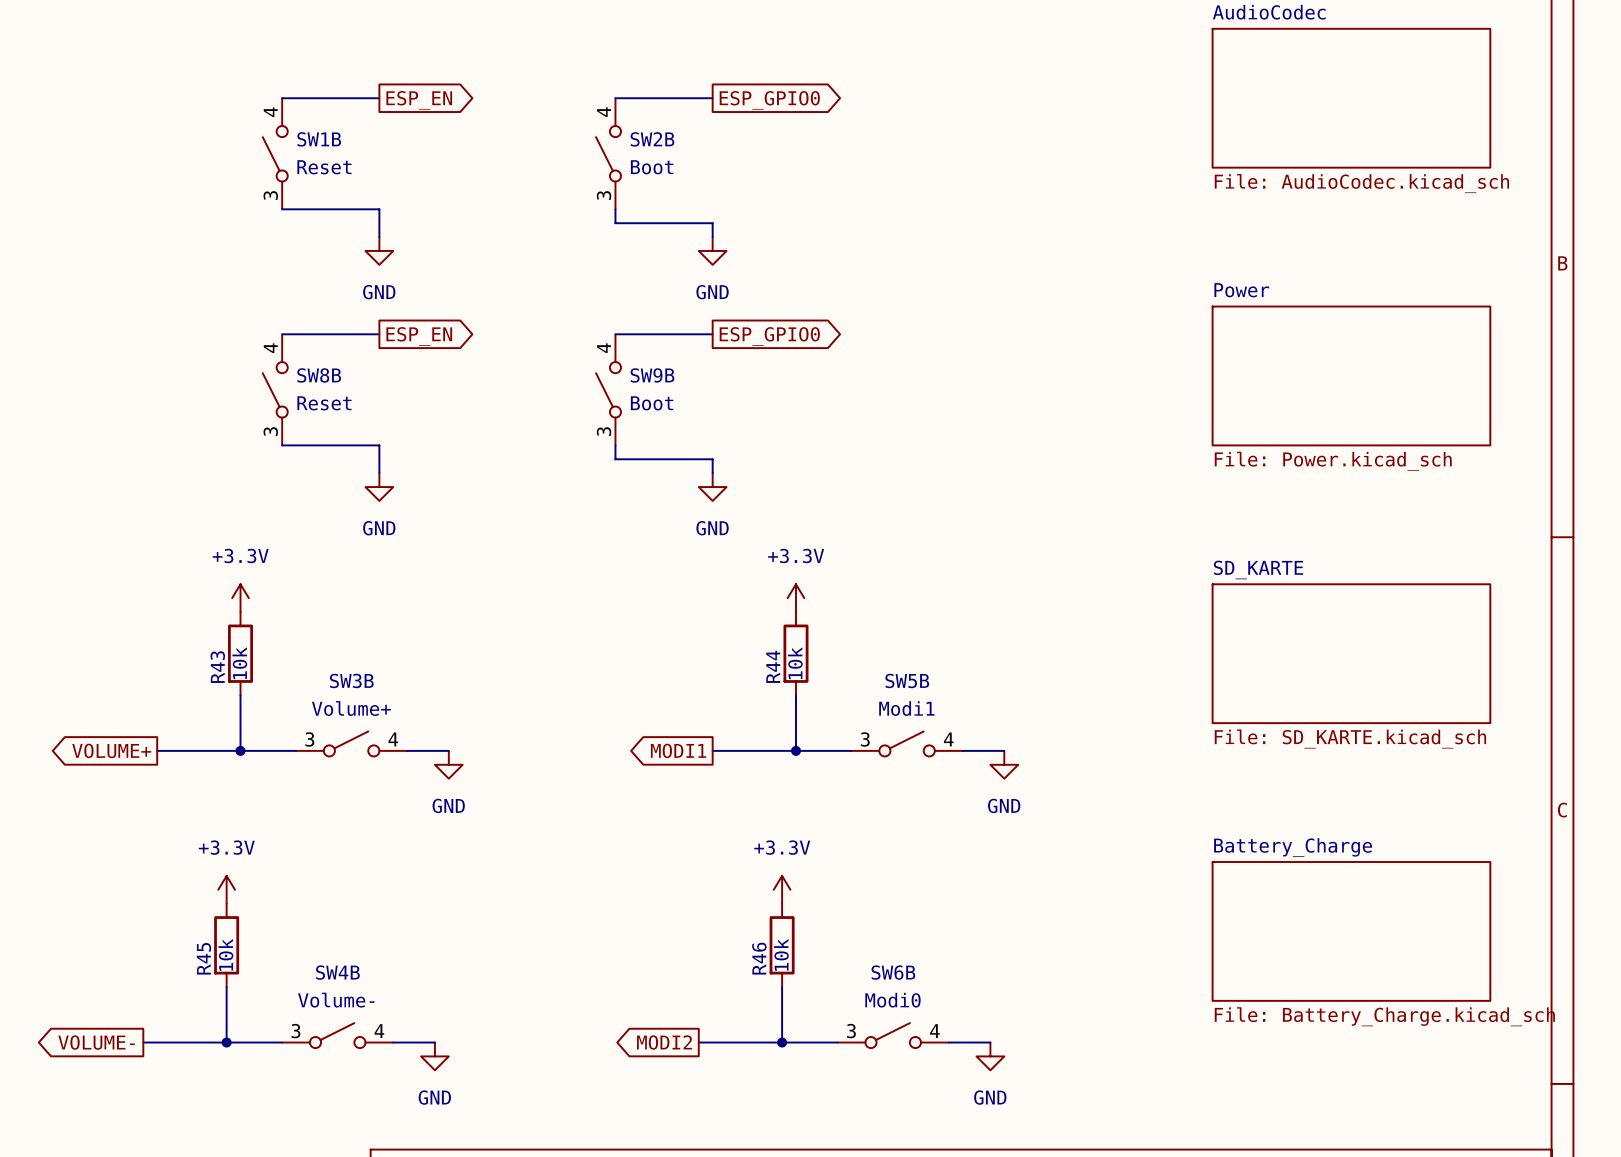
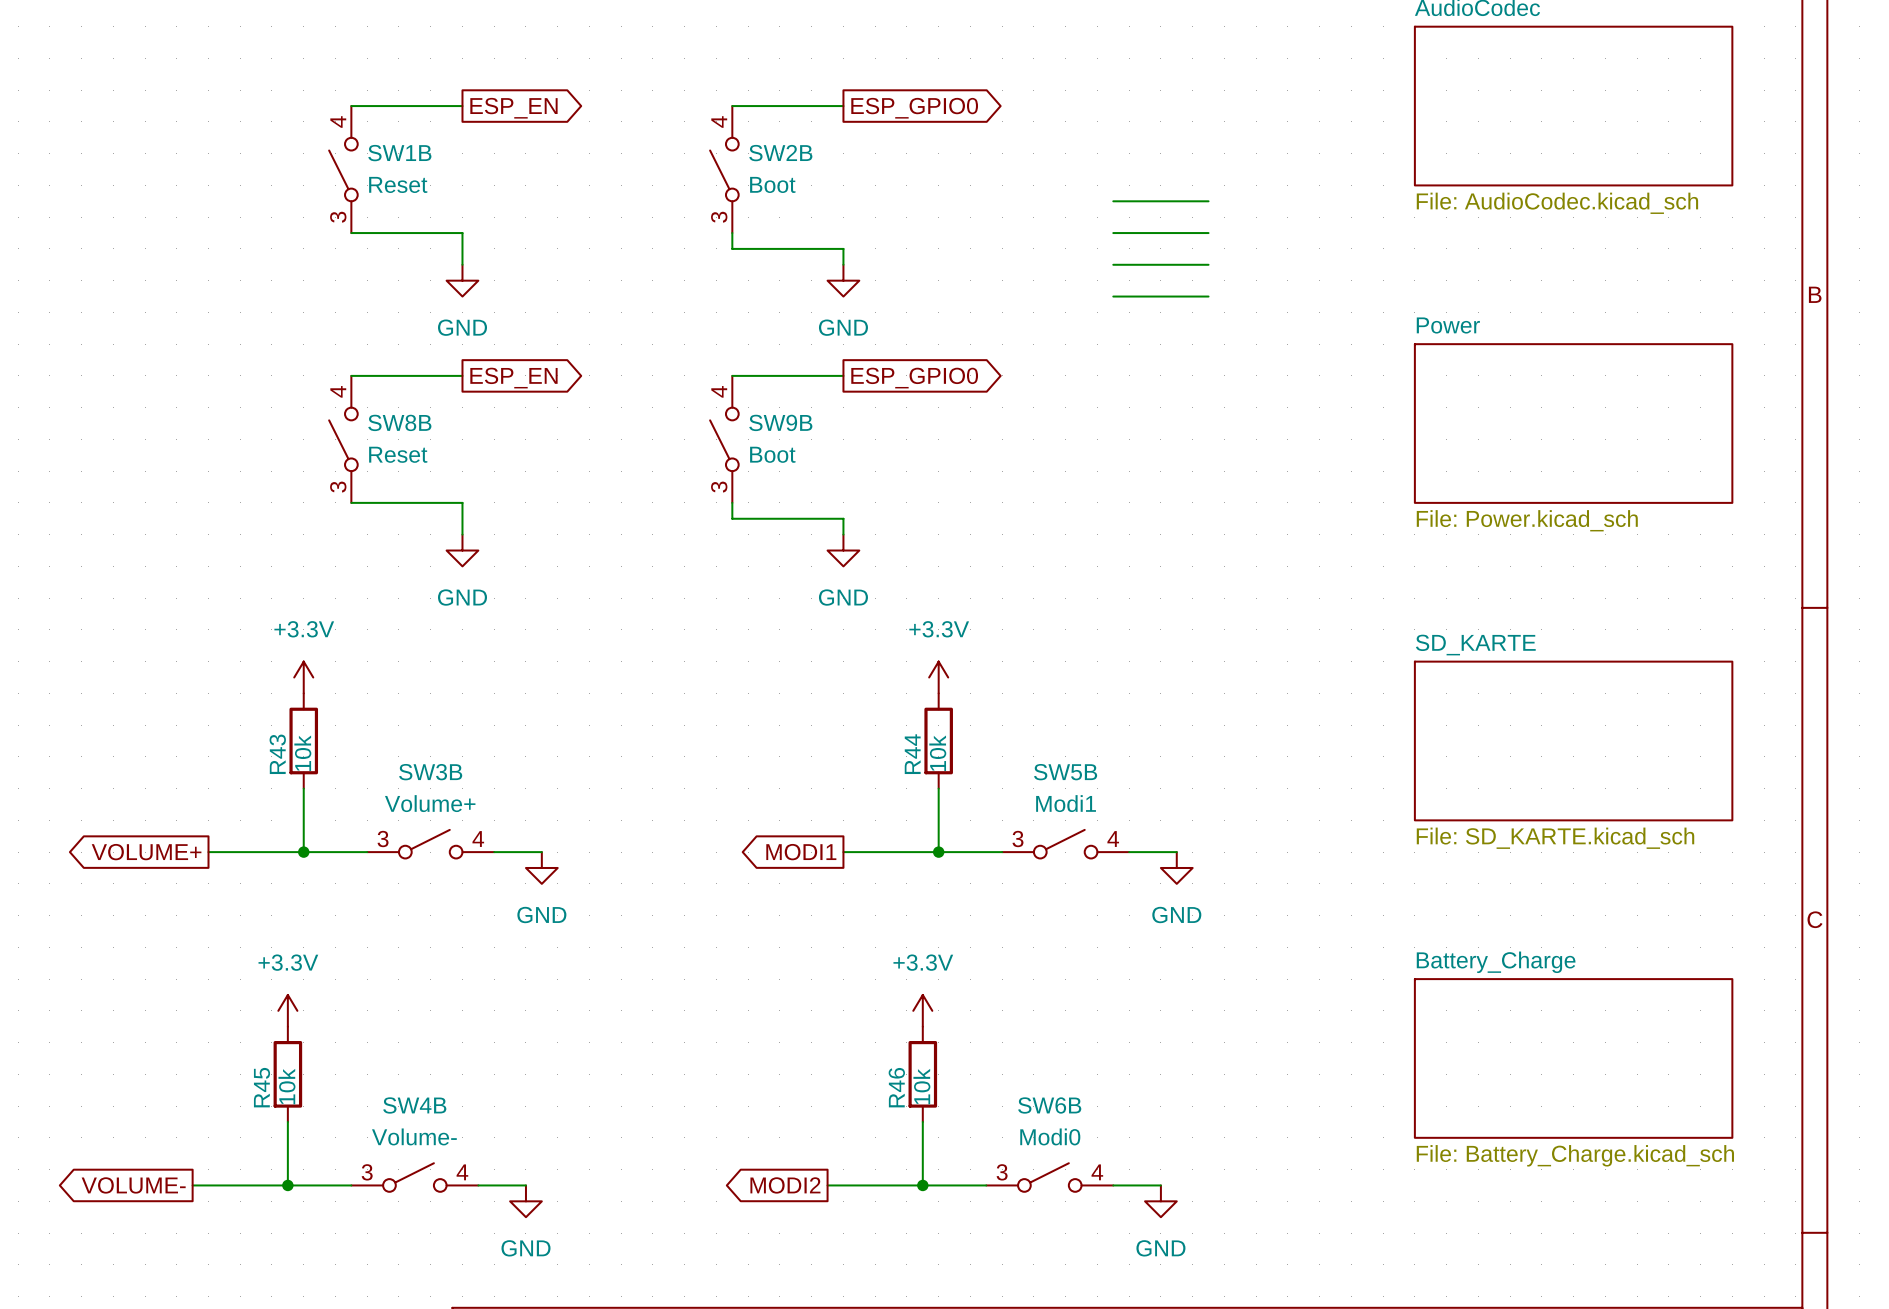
wire: none -> (1113, 201) (1208, 201)
wire: none -> (1113, 233) (1208, 233)
wire: none -> (1113, 264) (1208, 264)
wire: none -> (1113, 296) (1208, 296)

